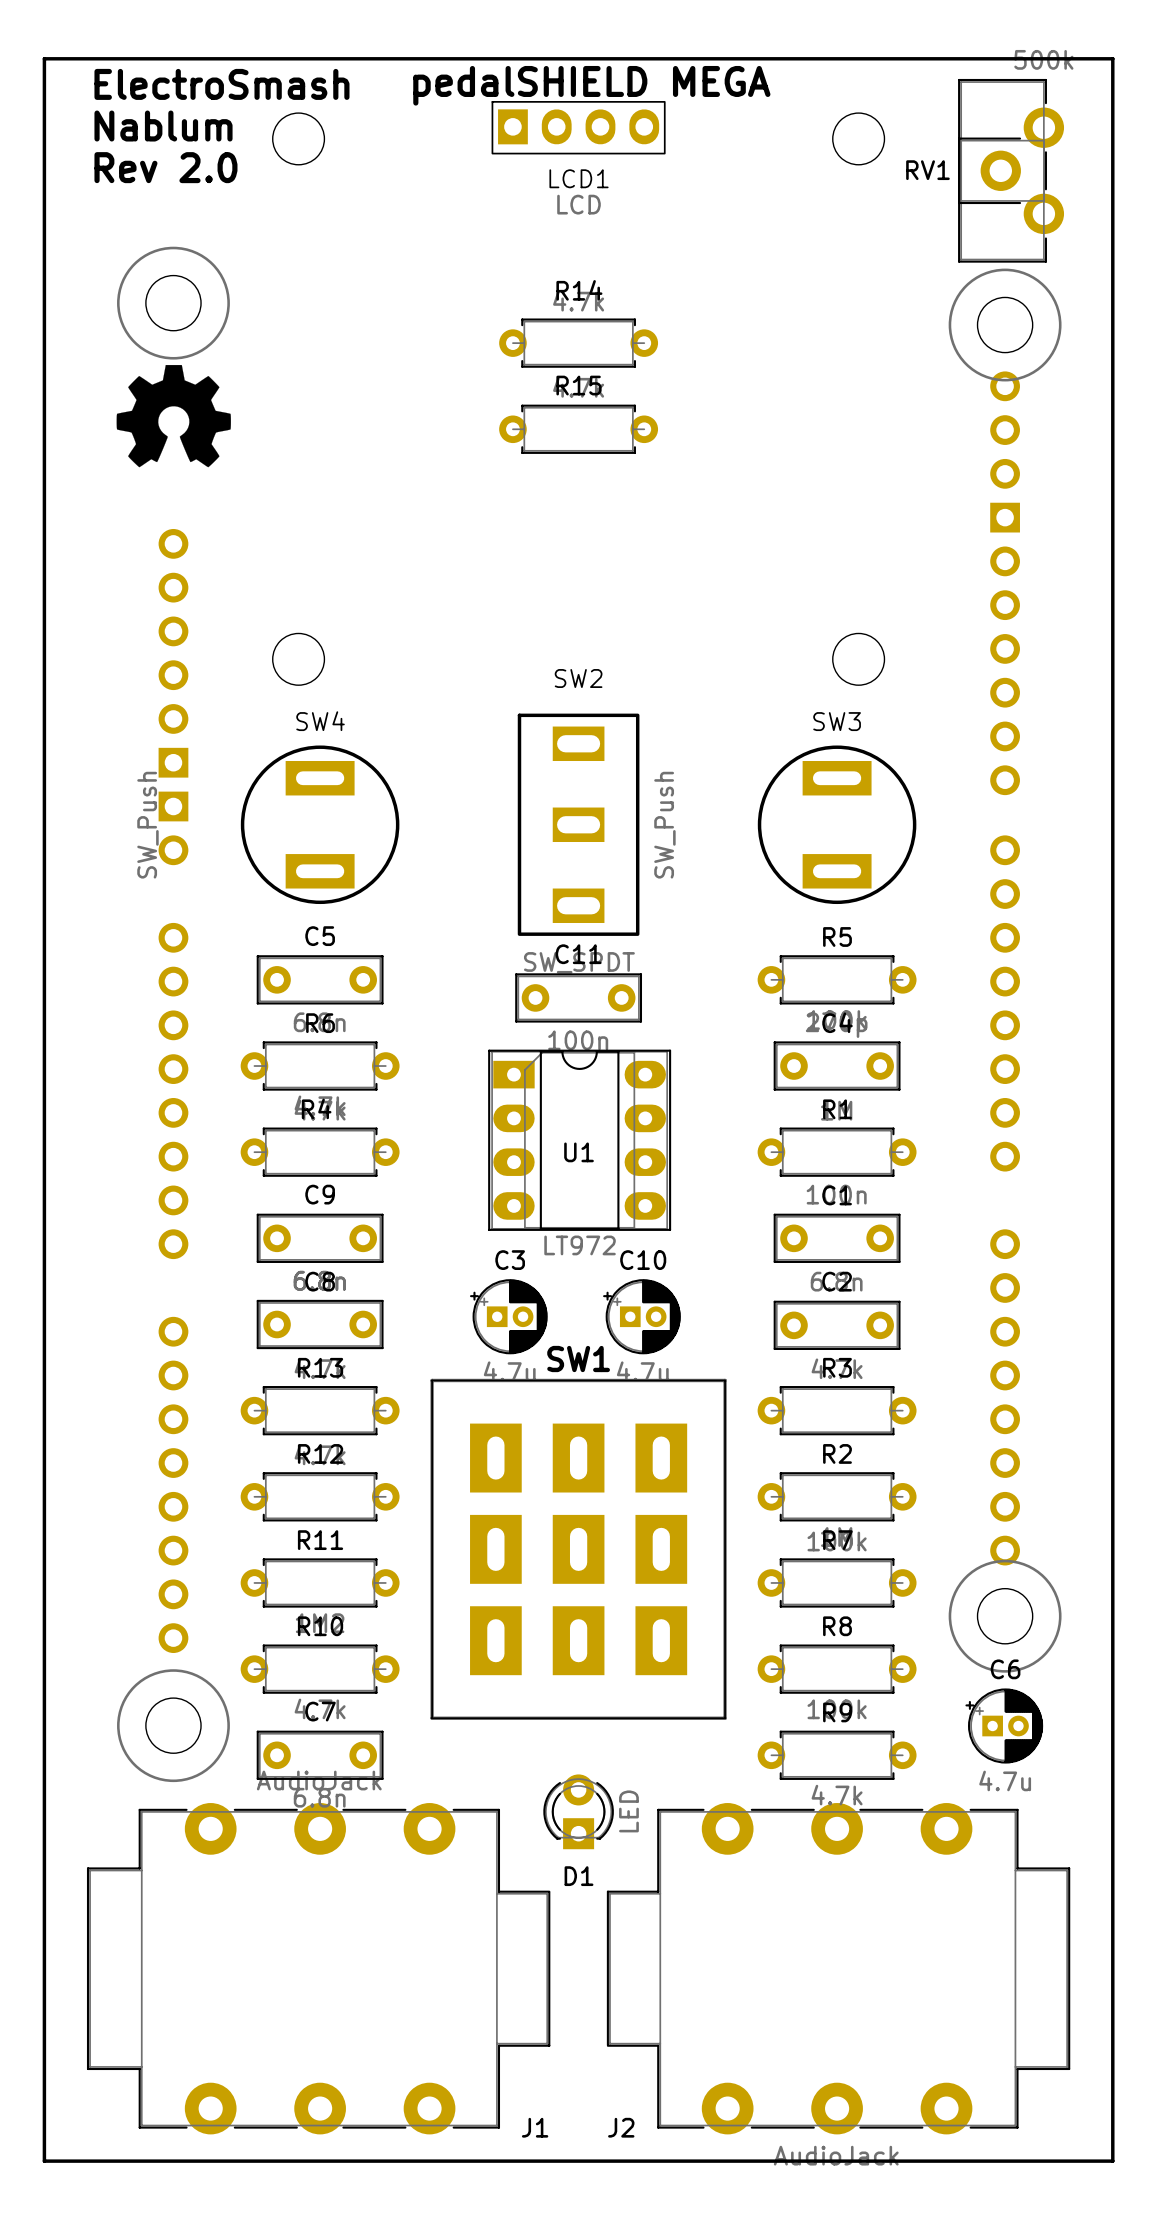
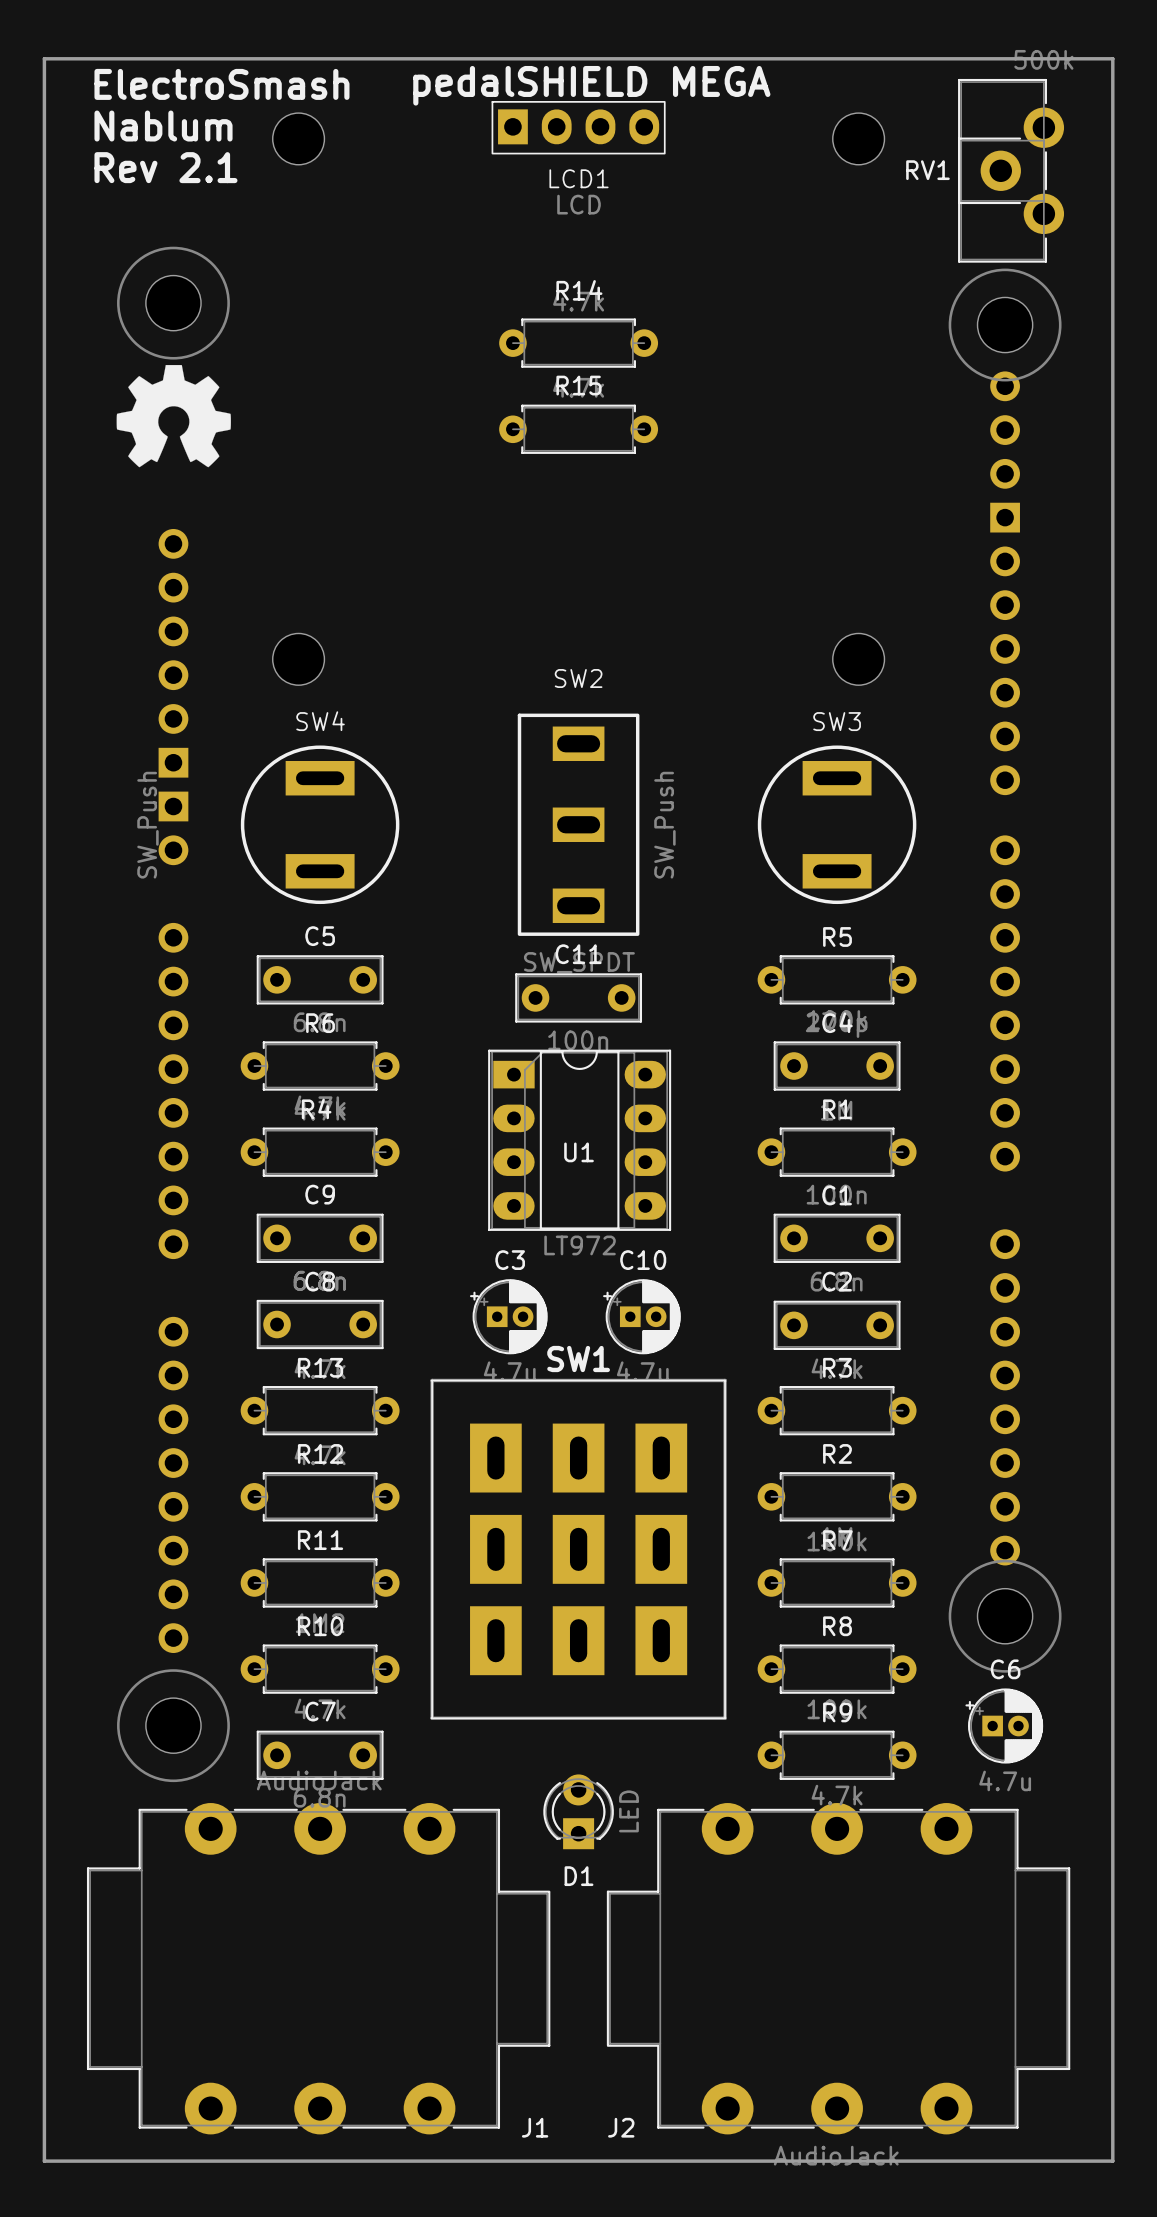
text: Rev 2.0 (165, 167) -> Rev 2.1 (165, 167)

